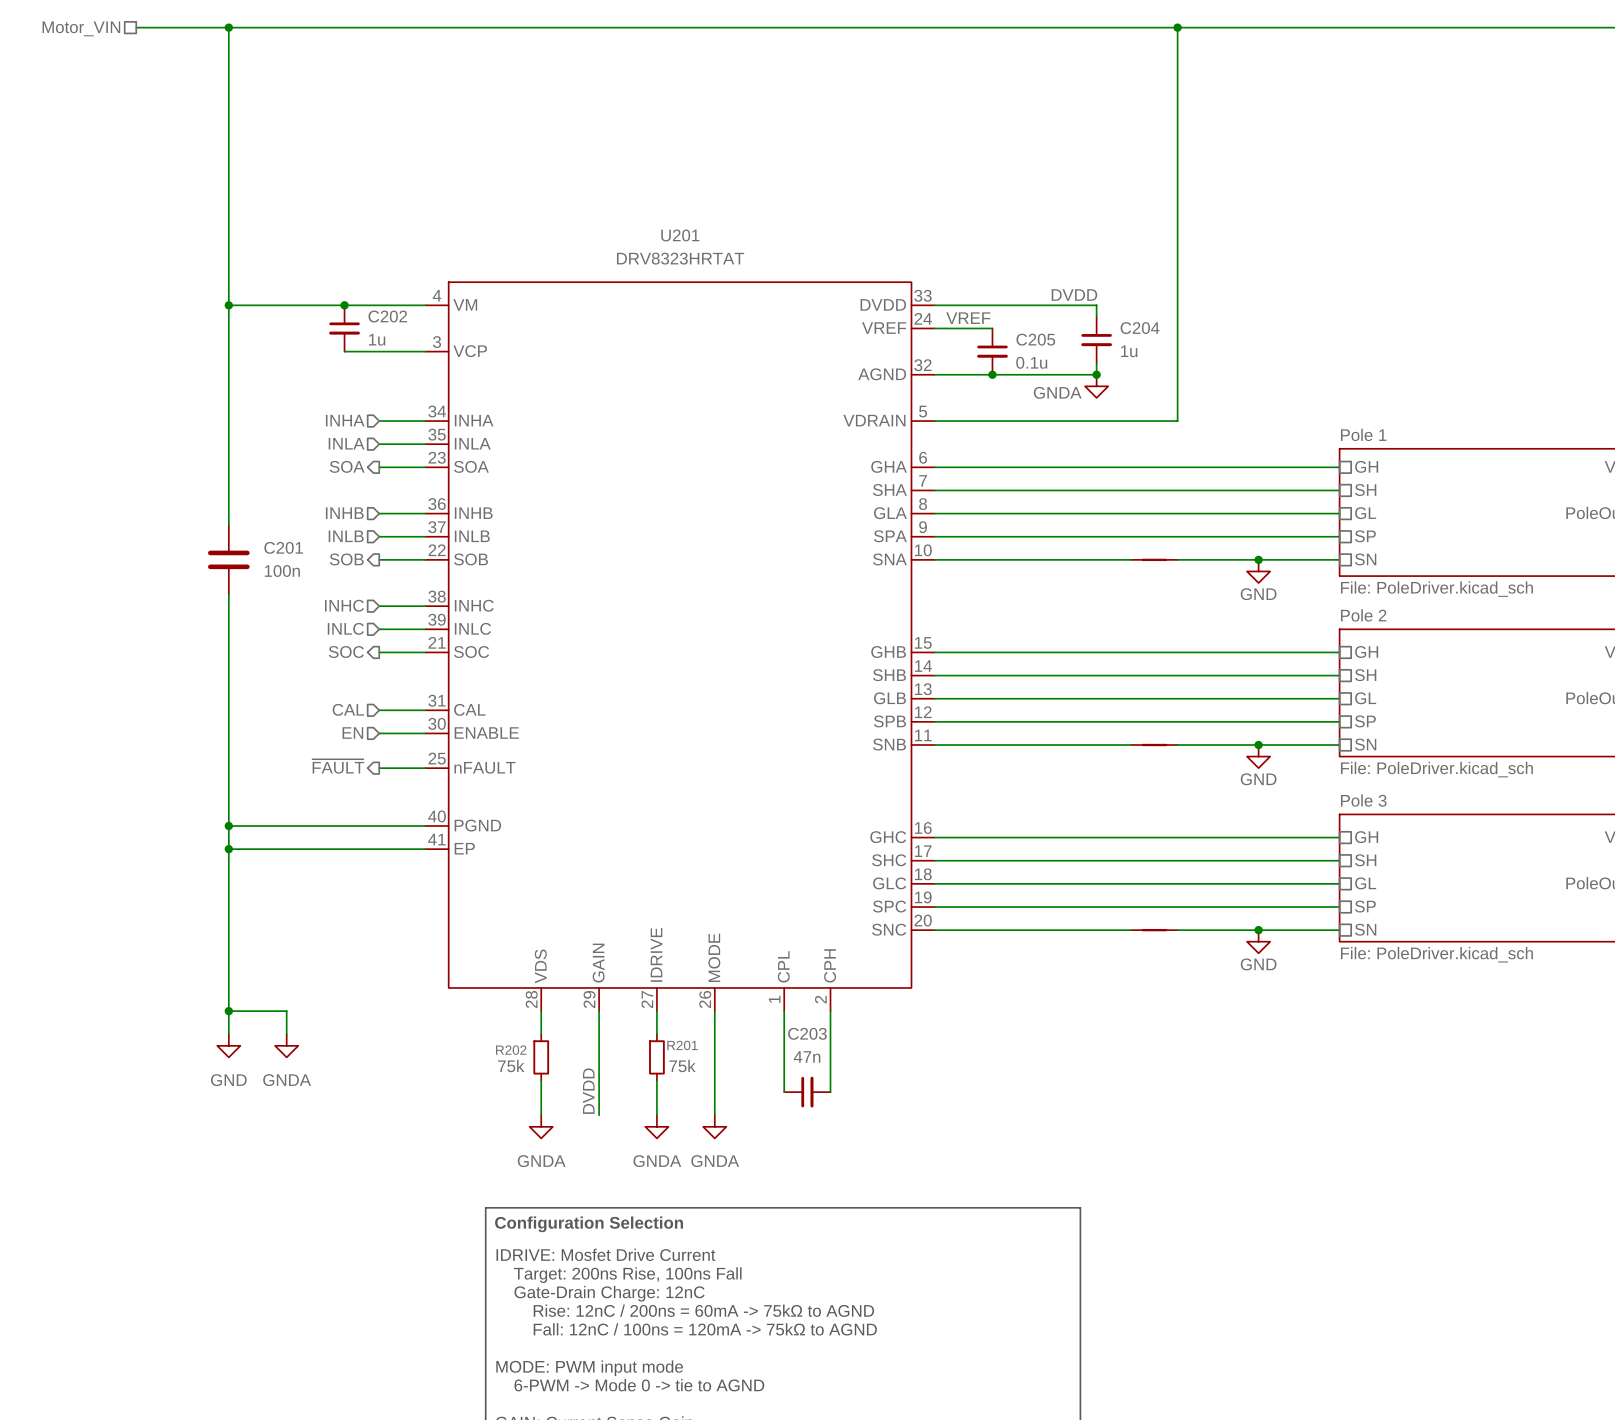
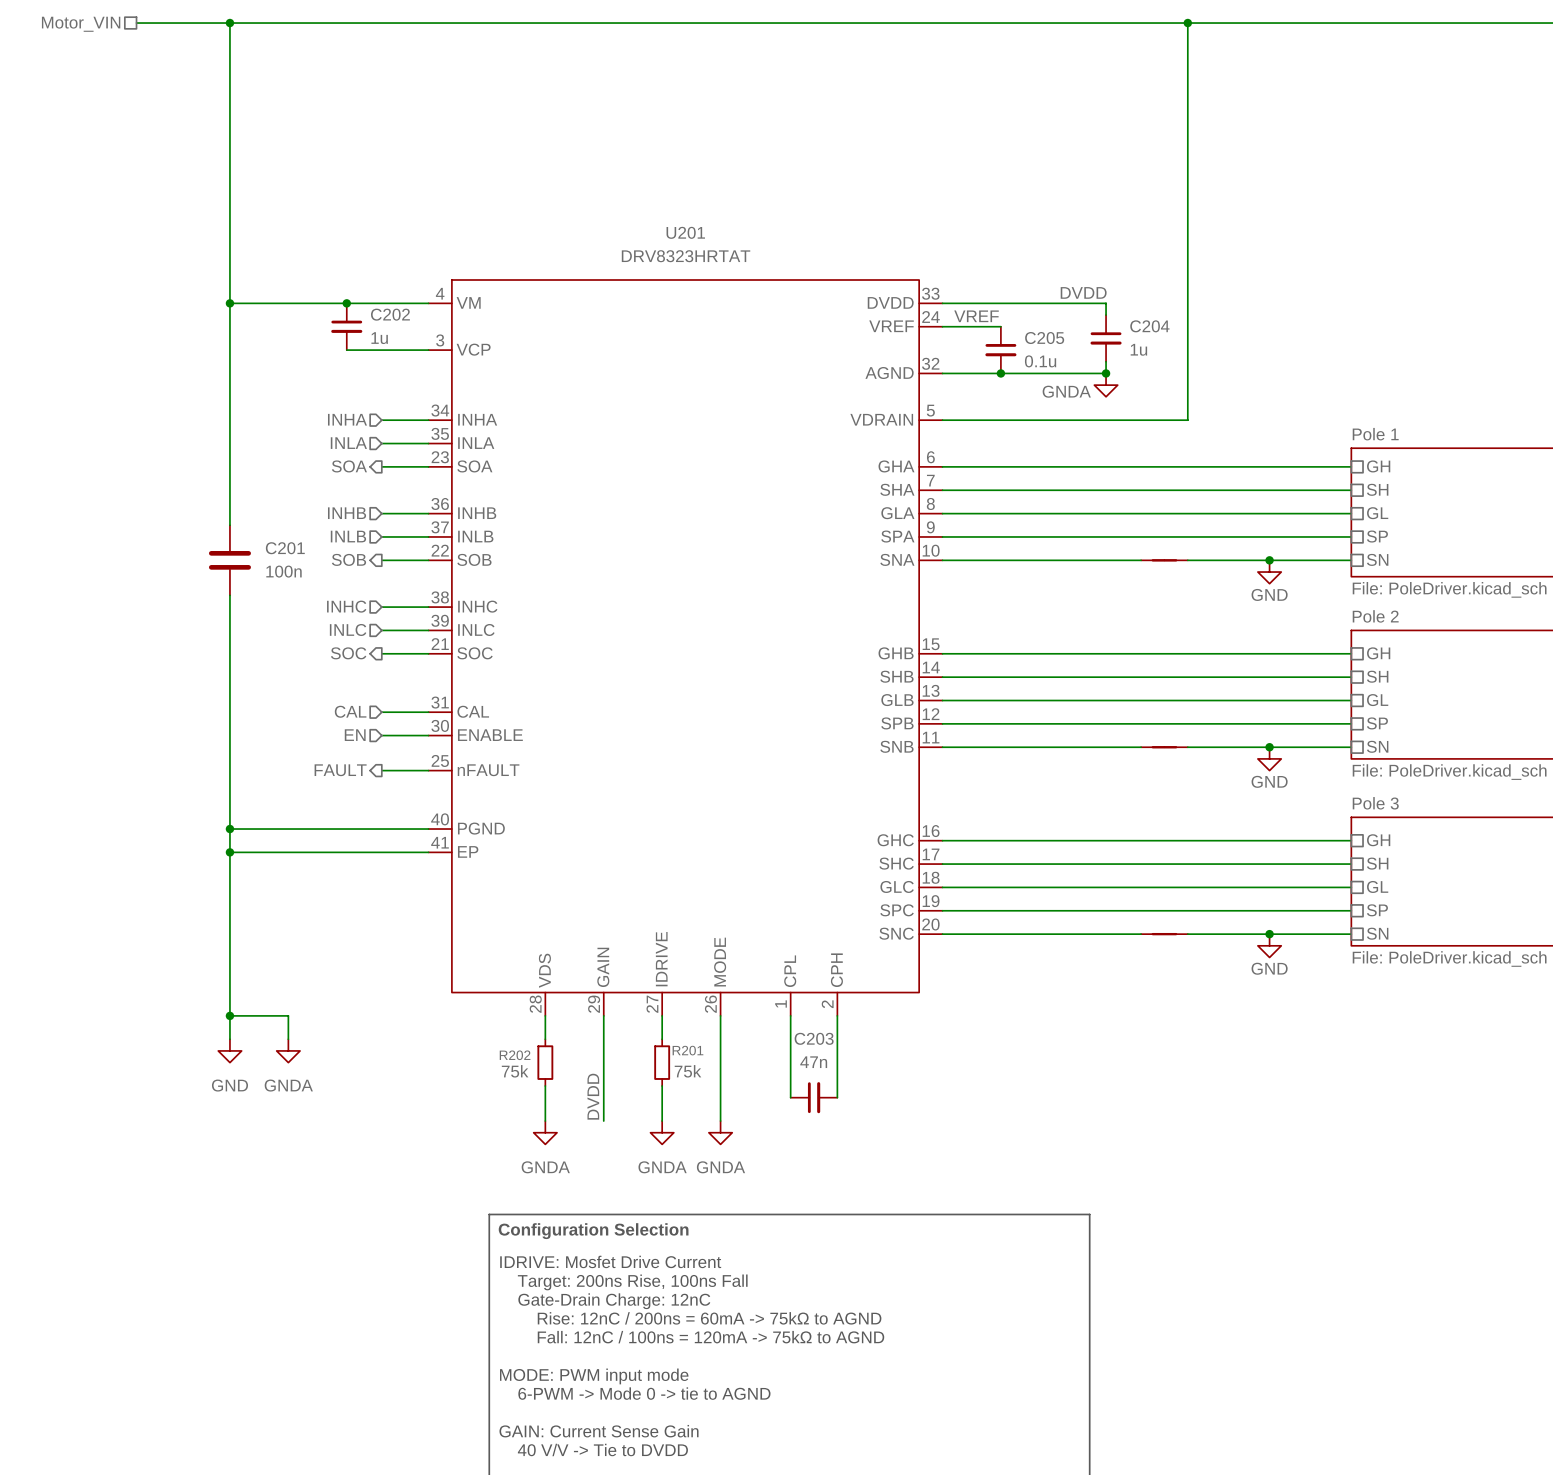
hierarchical label: ~{FAULT} (338, 766) -> FAULT (340, 770)

